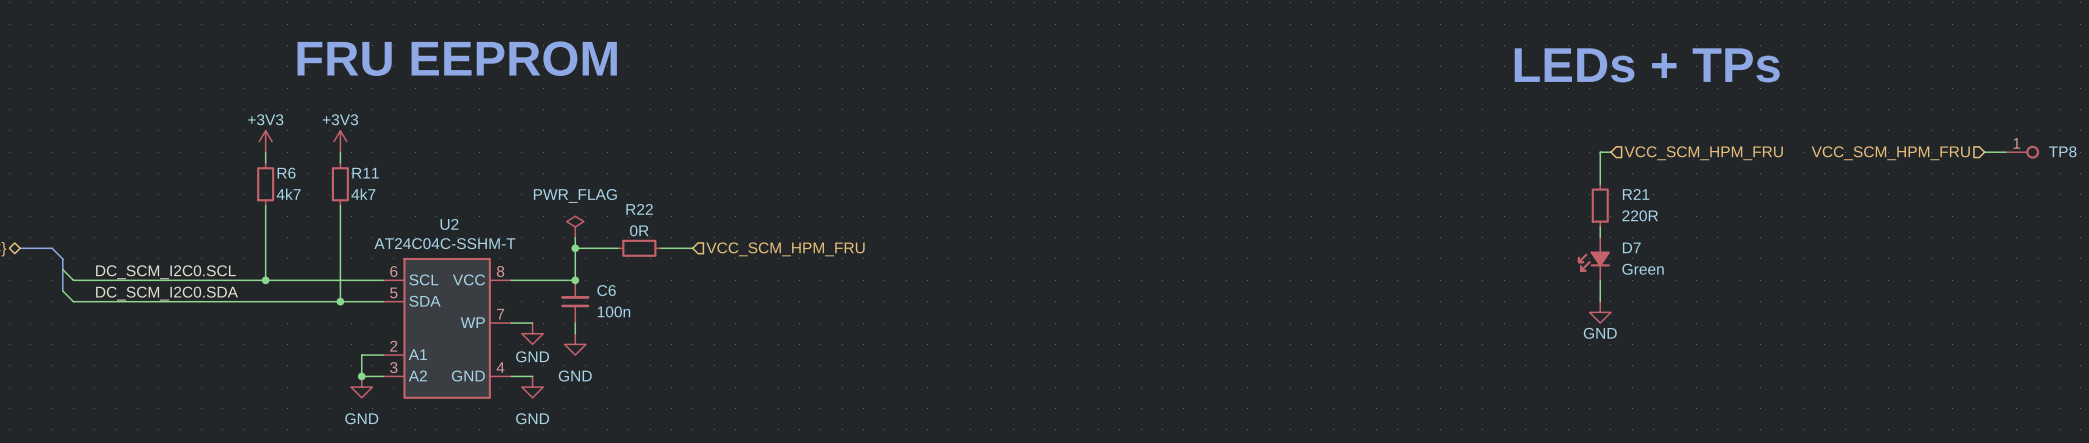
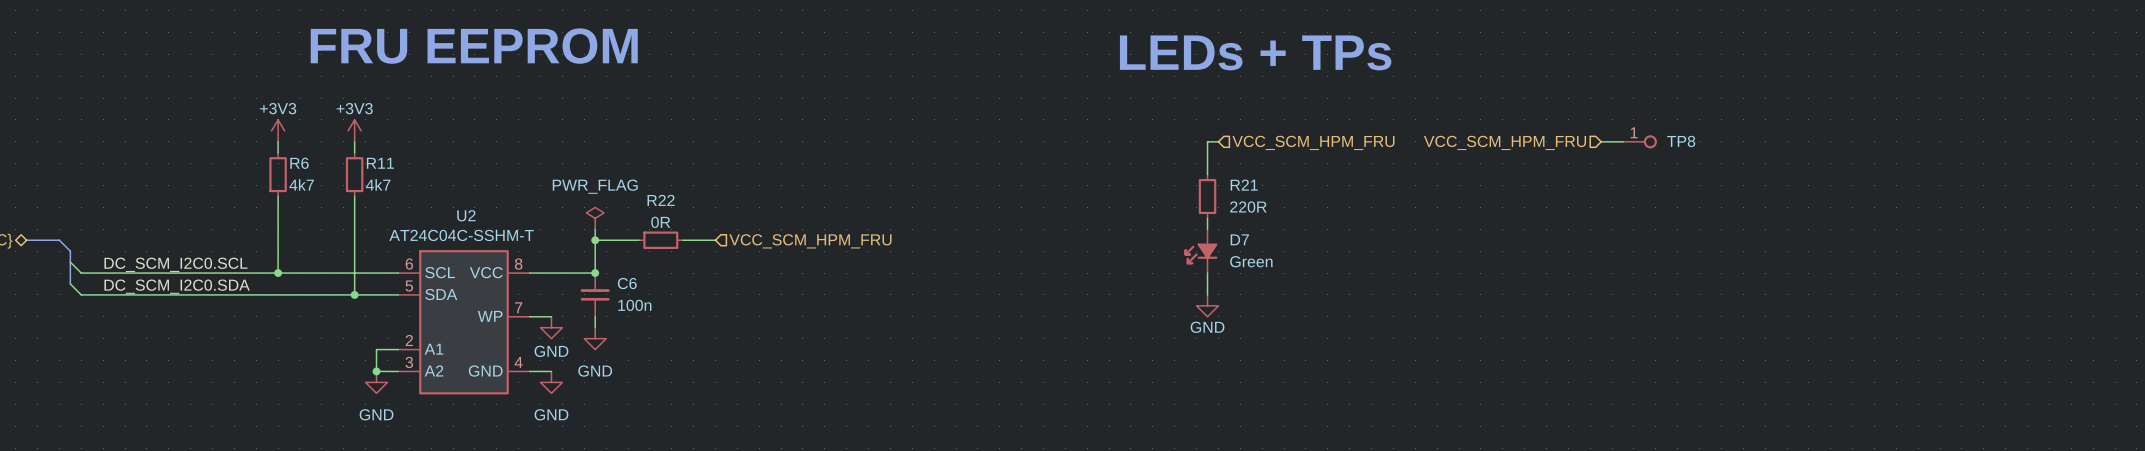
text: none -> LEDs + TPs (1255, 52)
text: LEDs + TPs (1647, 65) -> none
wire: none -> (1218, 141) (1207, 141) (1207, 174)
wire: none -> (1601, 141) (1623, 141)
wire: (1610, 152) (1600, 152) (1600, 184) -> none
wire: (1984, 152) (2005, 152) -> none
TP8 position: (2022, 152) -> (1639, 141)
hierarchical label: none -> VCC_SCM_HPM_FRU (1313, 142)
hierarchical label rotation: 0° (1703, 153) -> 180° (1505, 142)
hierarchical label position: VCC_SCM_HPM_FRU (1703, 153) -> VCC_SCM_HPM_FRU (1505, 142)
hierarchical label: VCC_SCM_HPM_FRU (1890, 153) -> none
R21 position: (1600, 205) -> (1207, 196)
wire: none -> (1207, 218) (1207, 229)
wire: (1600, 226) (1600, 237) -> none
D7 position: (1593, 258) -> (1200, 251)
wire: none -> (1207, 273) (1207, 294)
wire: (1600, 280) (1600, 301) -> none
power symbol: none -> GND (1207, 305)
power symbol: GND (1600, 312) -> none

